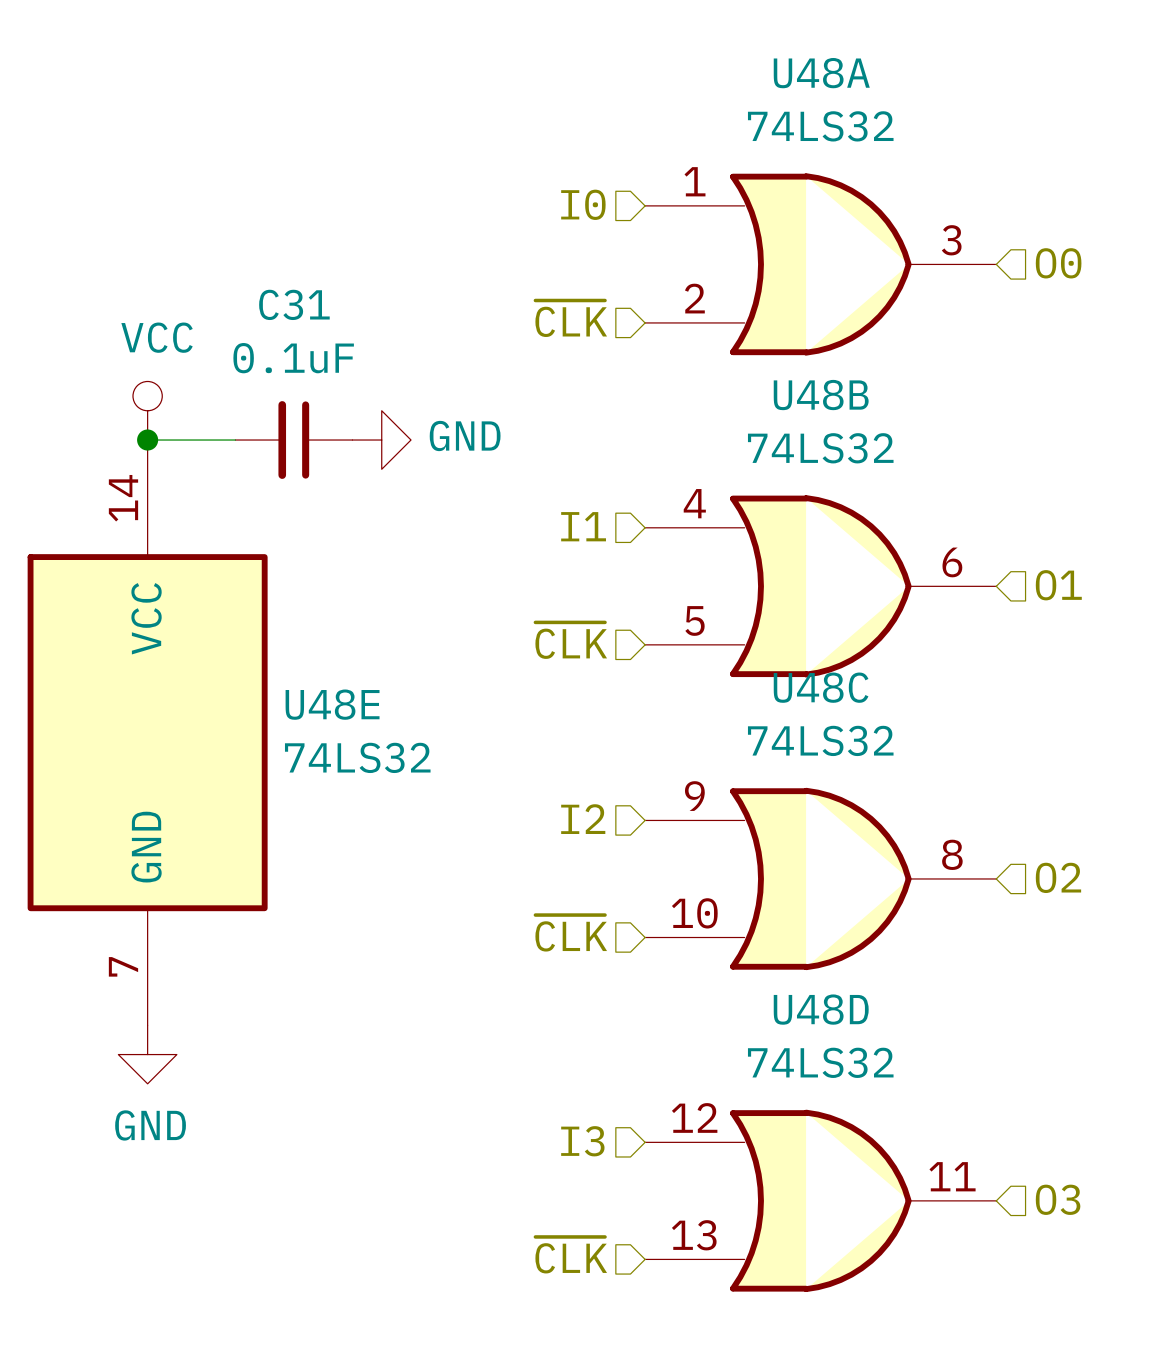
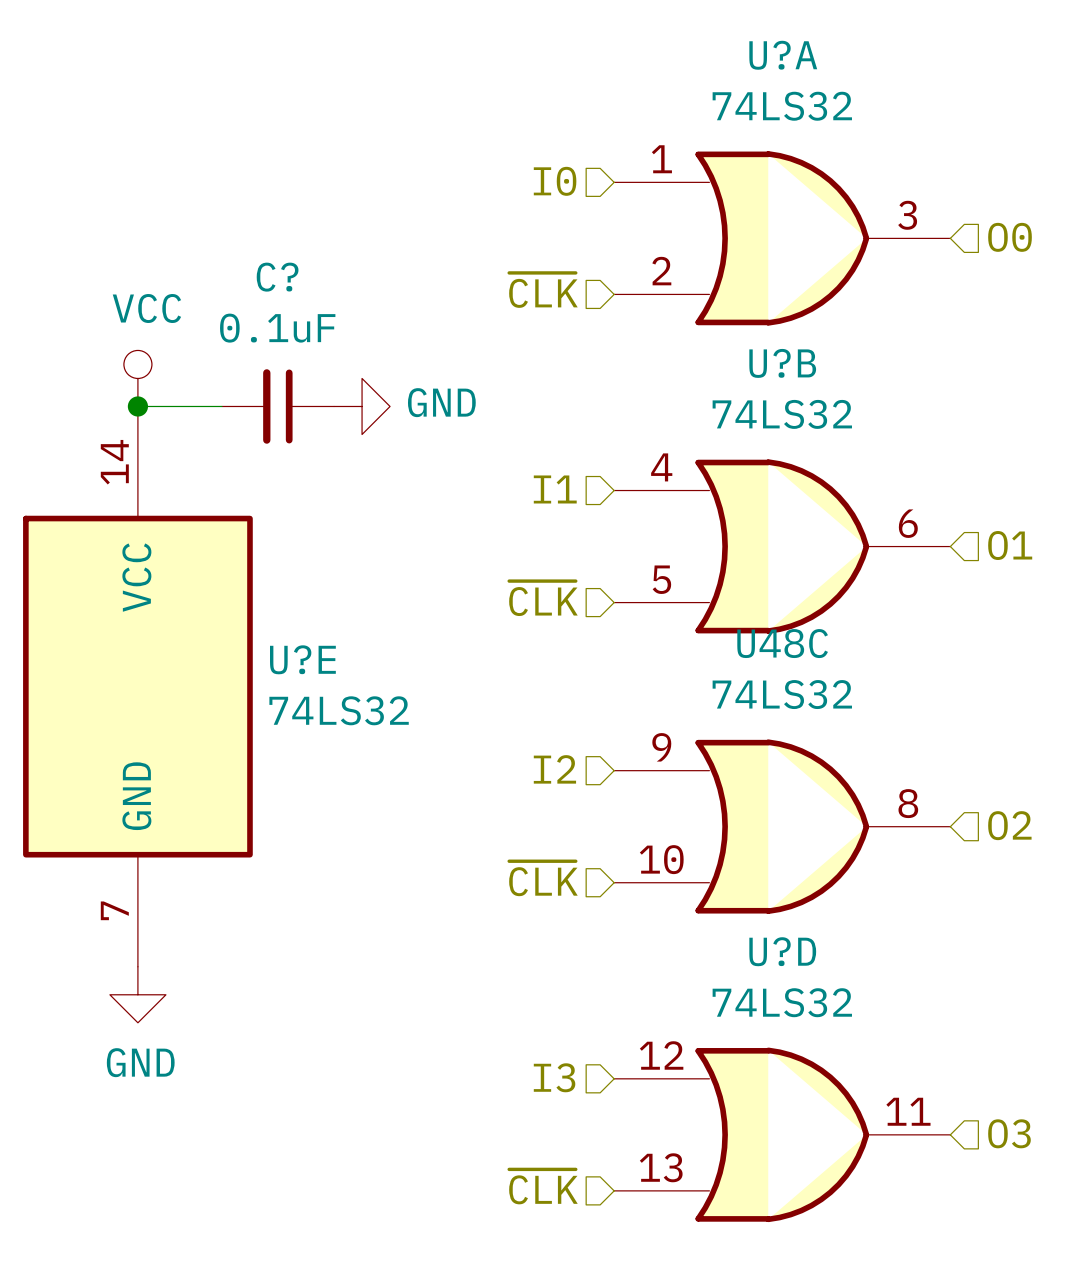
U48A name: U48A (821, 73) -> U?A (783, 55)
C31 name: C31 (294, 304) -> C? (277, 277)
U48B name: U48B (821, 395) -> U?B (782, 363)
U48E name: U48E (332, 704) -> U?E (302, 659)
U48D name: U48D (821, 1009) -> U?D (782, 951)

